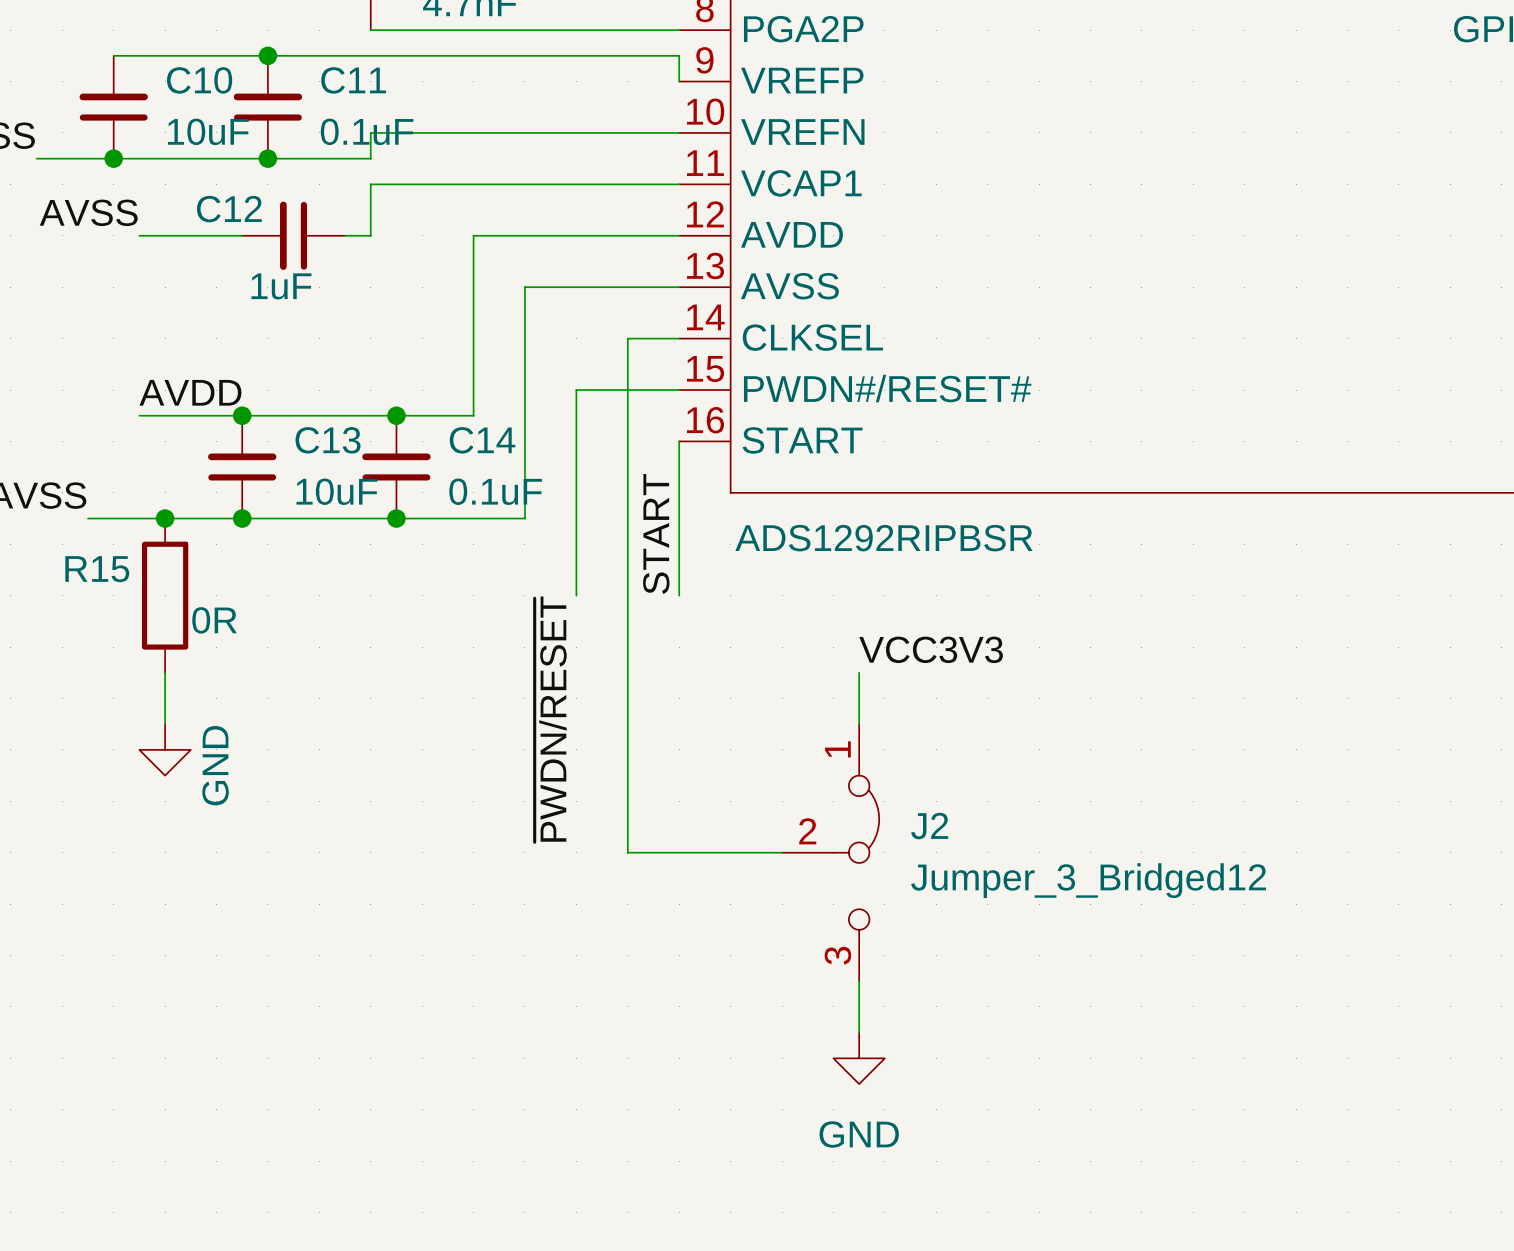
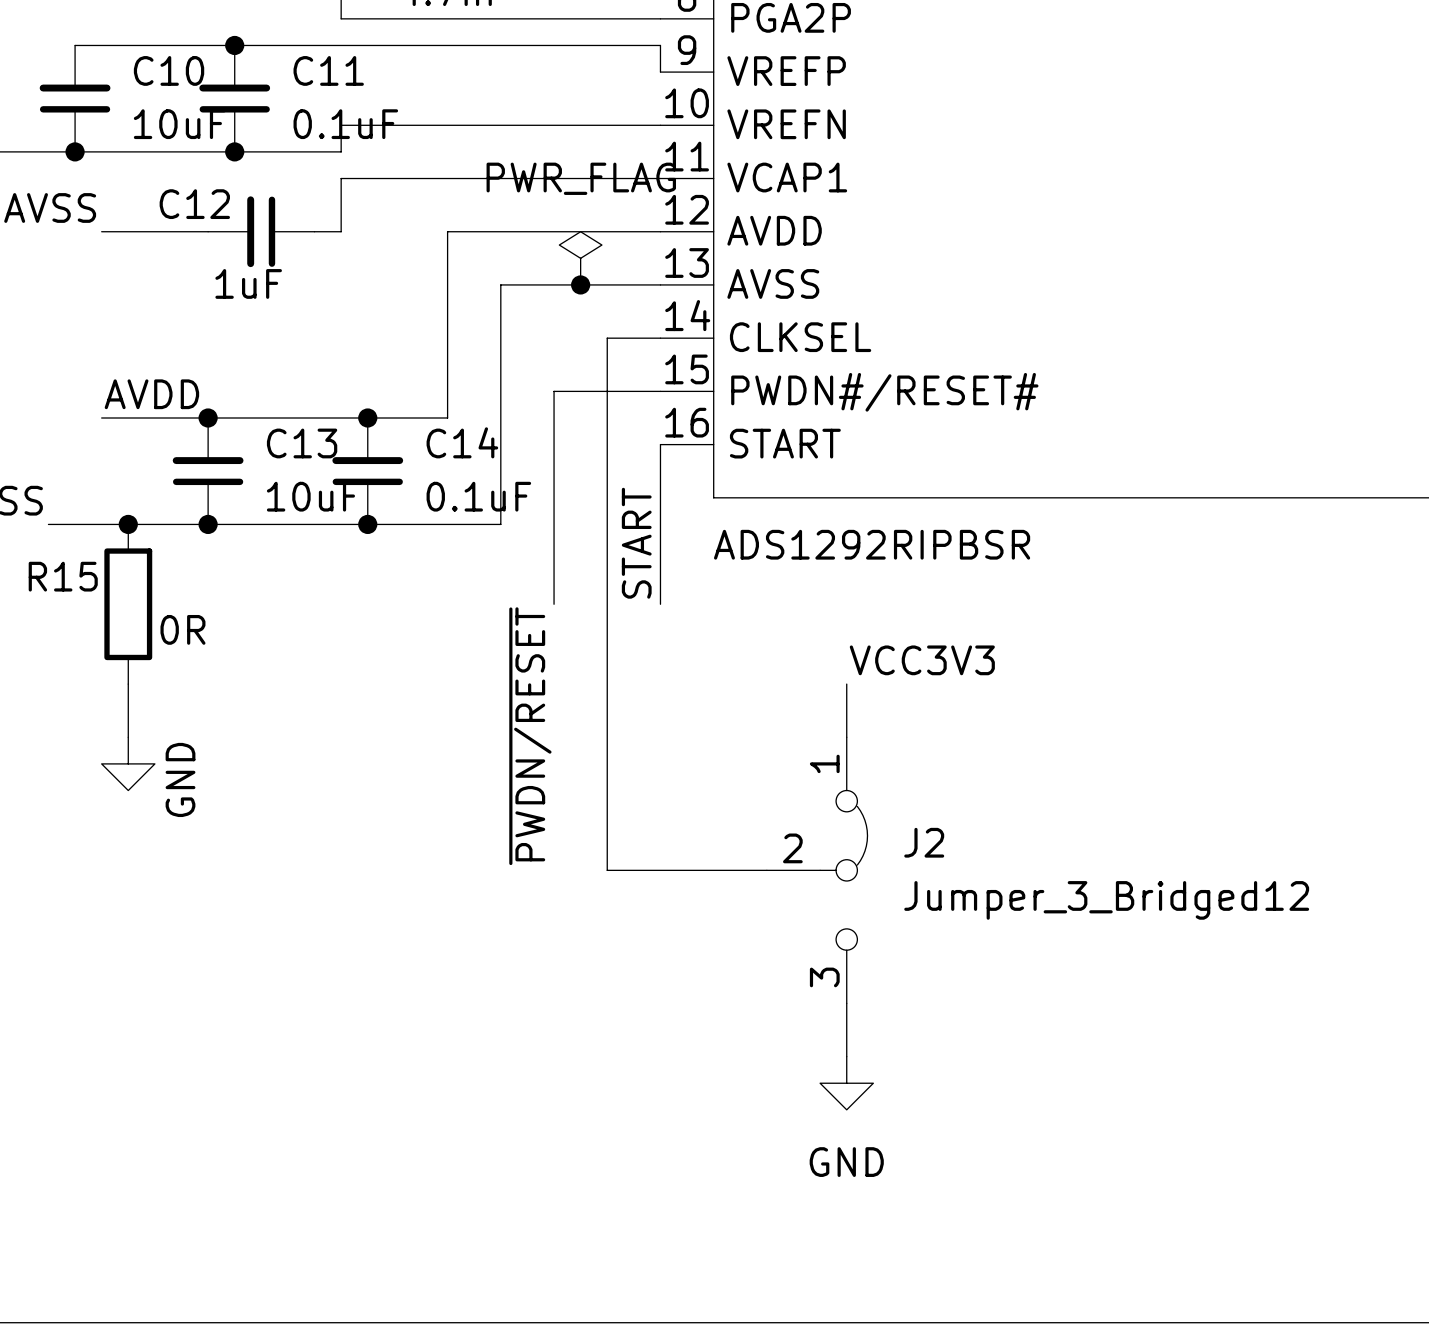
power symbol: none -> PWR_FLAG (580, 258)
junction: none -> (580, 284)

